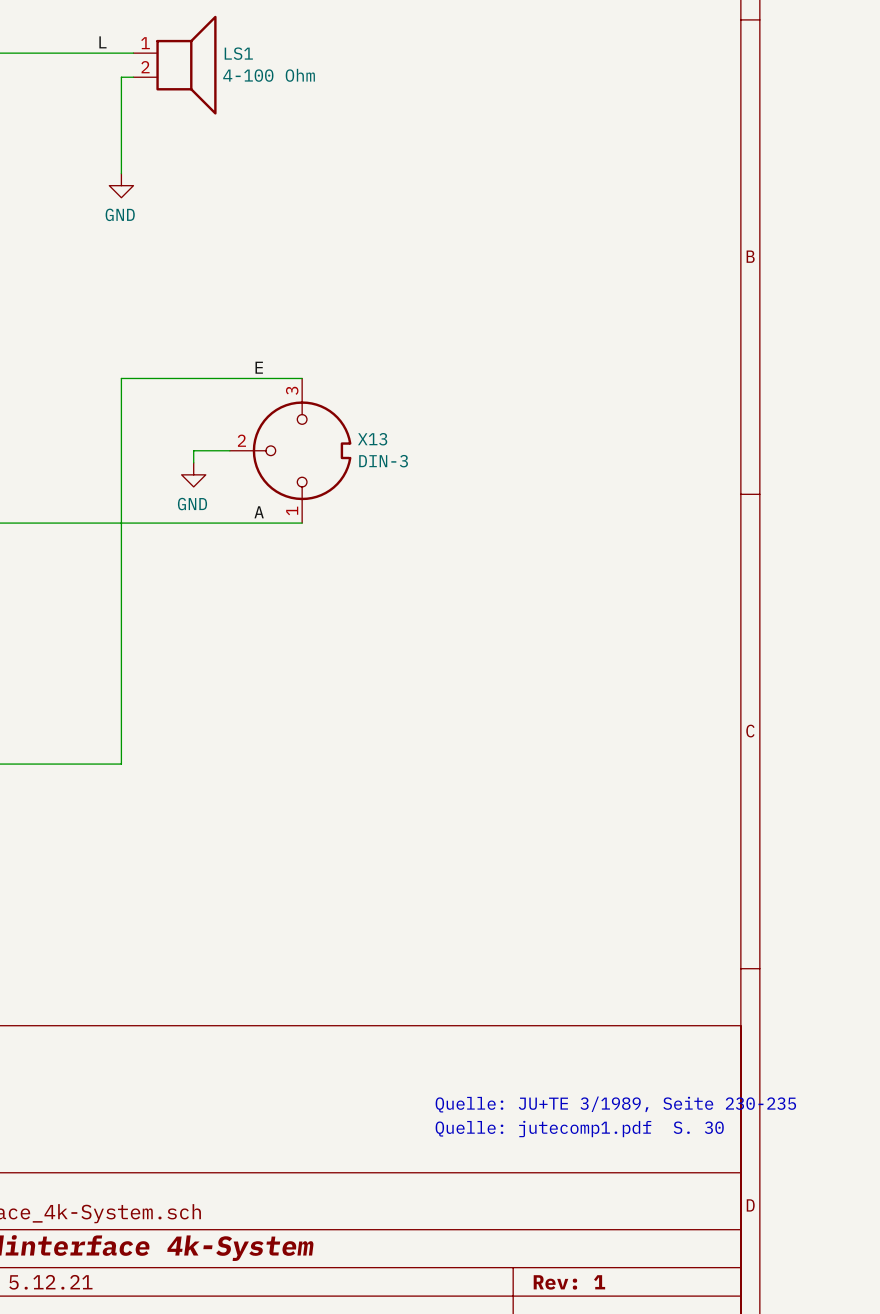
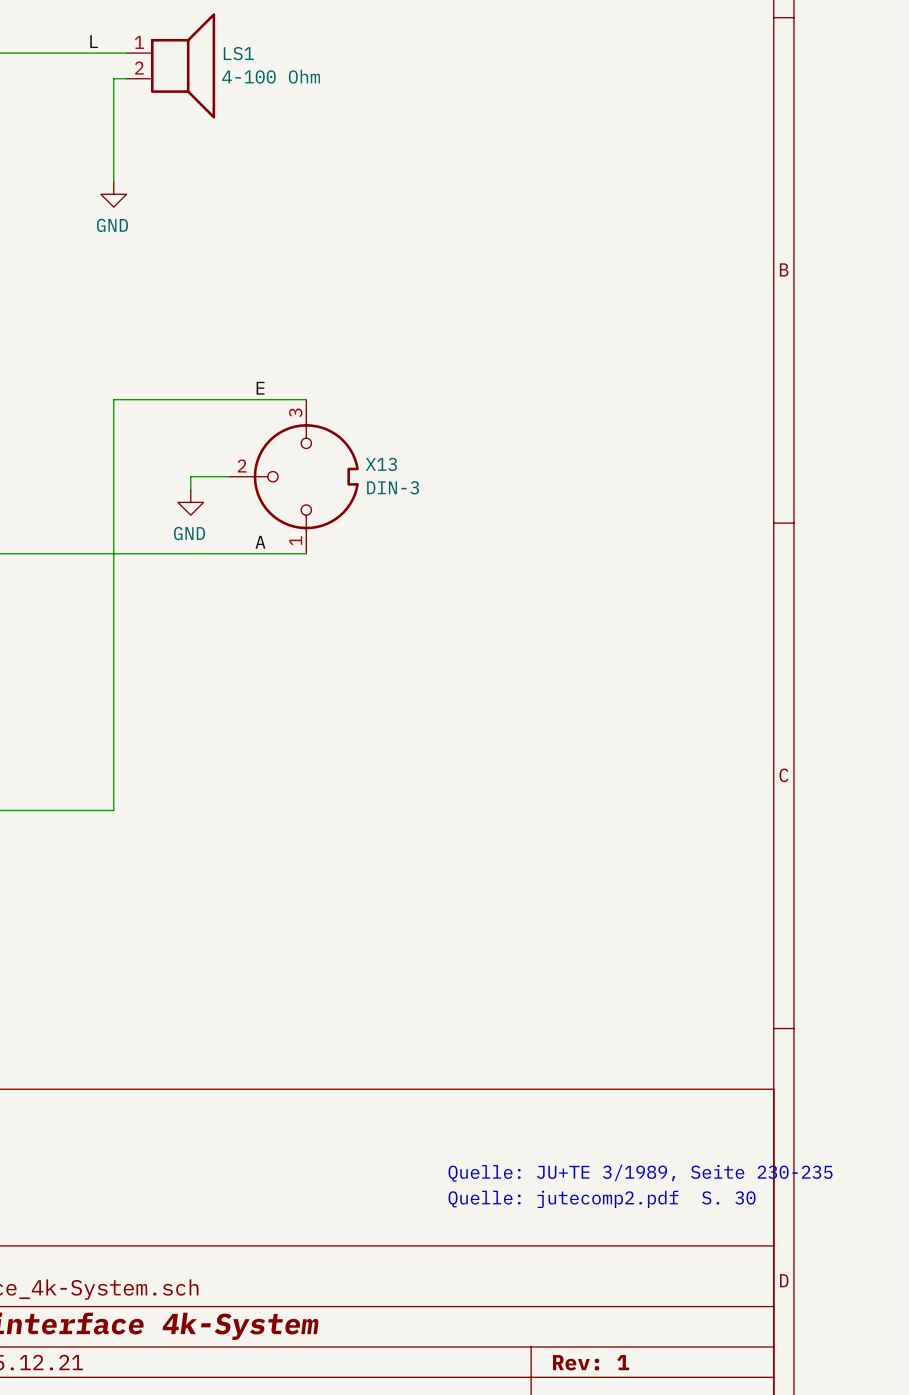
text: Quelle: jutecomp1.pdf S. 30 (579, 1129) -> Quelle: jutecomp2.pdf S. 30 (602, 1199)

